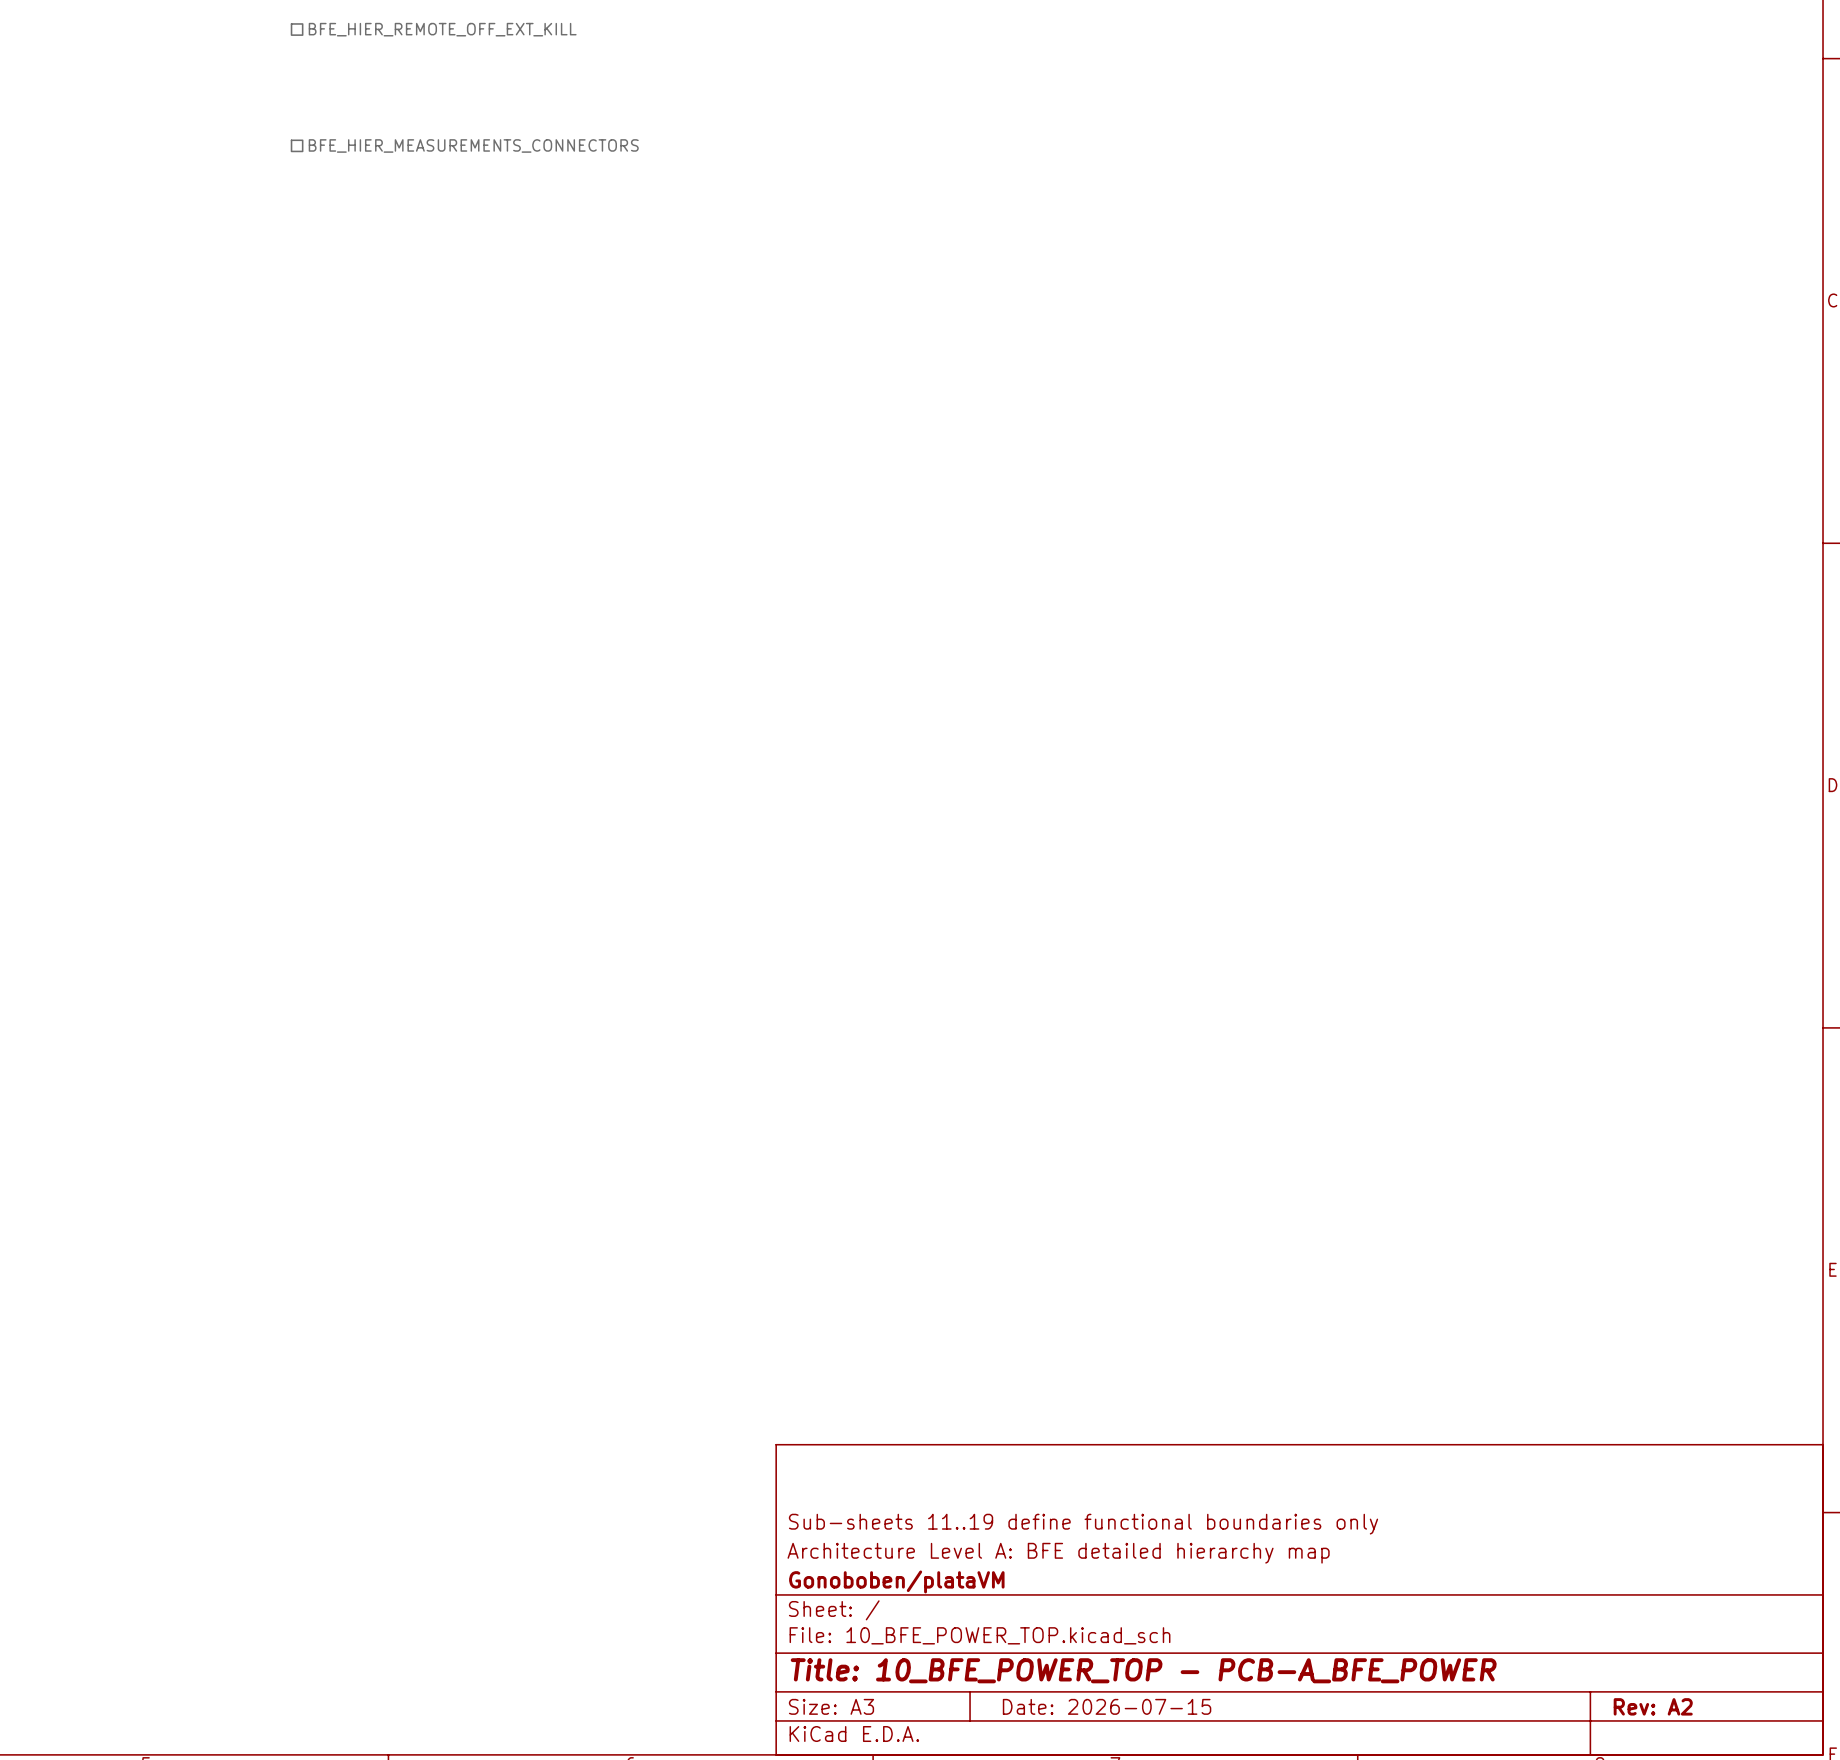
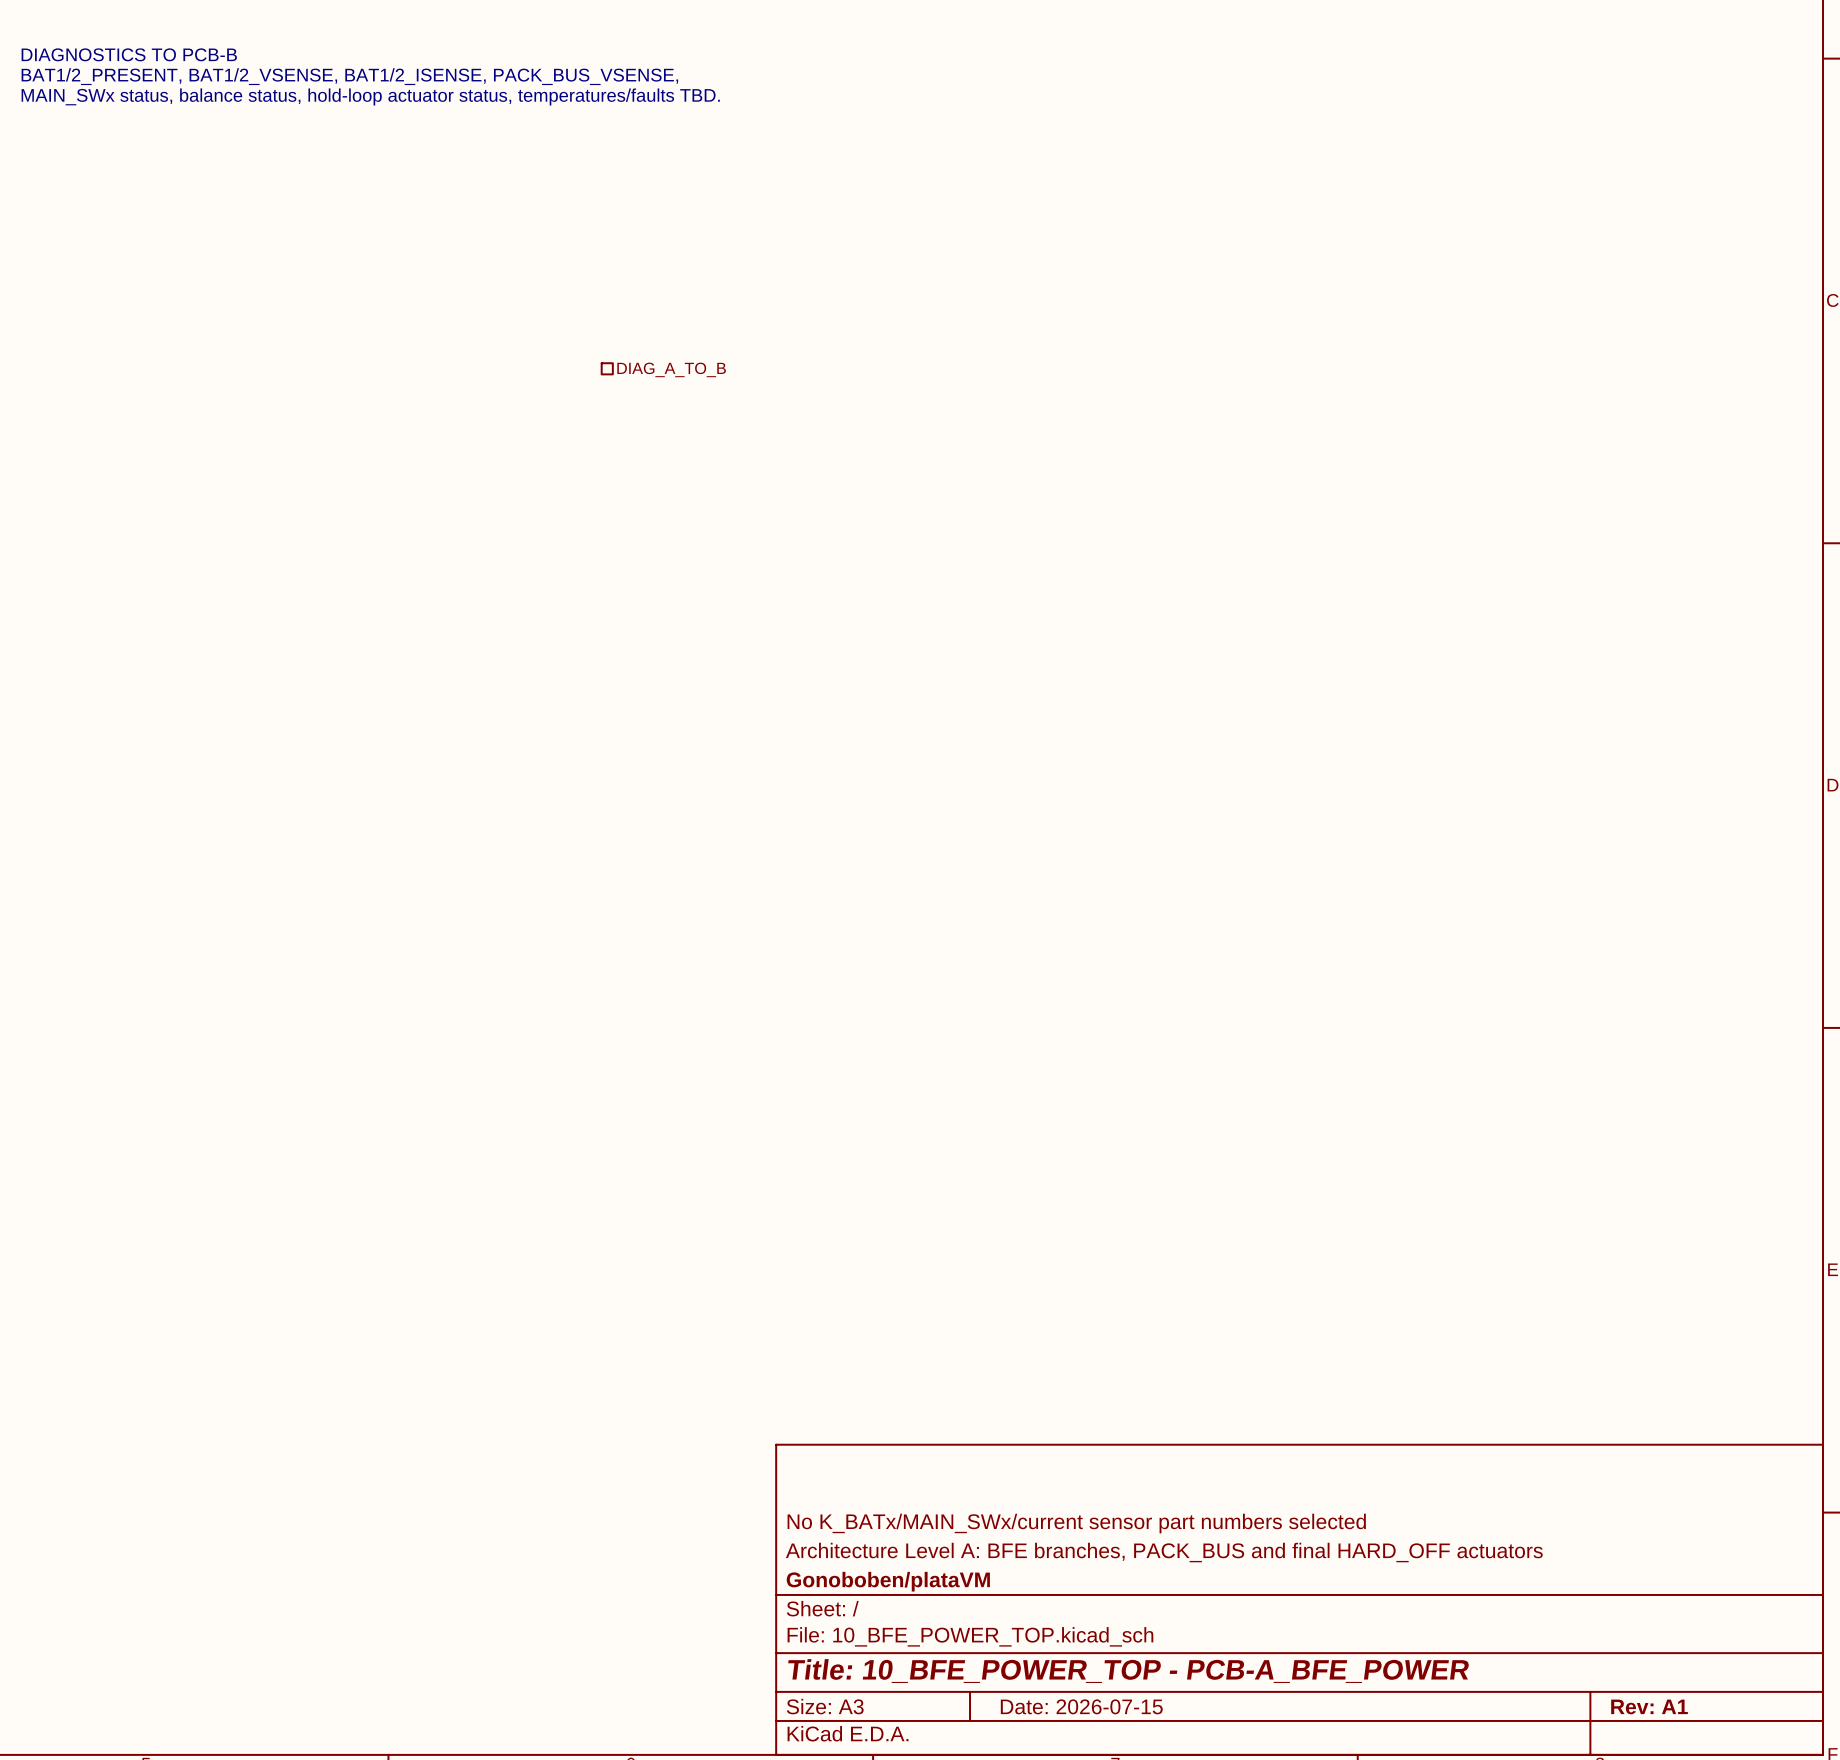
hierarchical label: BFE_HIER_REMOTE_OFF_EXT_KILL (442, 29) -> none
text: none -> DIAGNOSTICS TO PCB-B (129, 54)
text: none -> BAT1/2_PRESENT, BAT1/2_VSENSE, BAT1/2_ISENSE, PACK_BUS_VSENSE, (349, 76)
text: none -> MAIN_SWx status, balance status, hold-loop actuator status, temperatures/faults TBD. (370, 96)
hierarchical label: BFE_HIER_MEASUREMENTS_CONNECTORS (473, 145) -> none
hierarchical label: none -> DIAG_A_TO_B (671, 369)
title block: Sub-sheets 11..19 define functional boundaries only (1083, 1524) -> No K_BATx/MAIN_SWx/current sensor part numbers selected (1076, 1523)
title block: Architecture Level A: BFE detailed hierarchy map (1058, 1553) -> Architecture Level A: BFE branches, PACK_BUS and final HARD_OFF actuators (1164, 1552)
title block: Rev: A2 (1653, 1706) -> Rev: A1 (1649, 1706)

